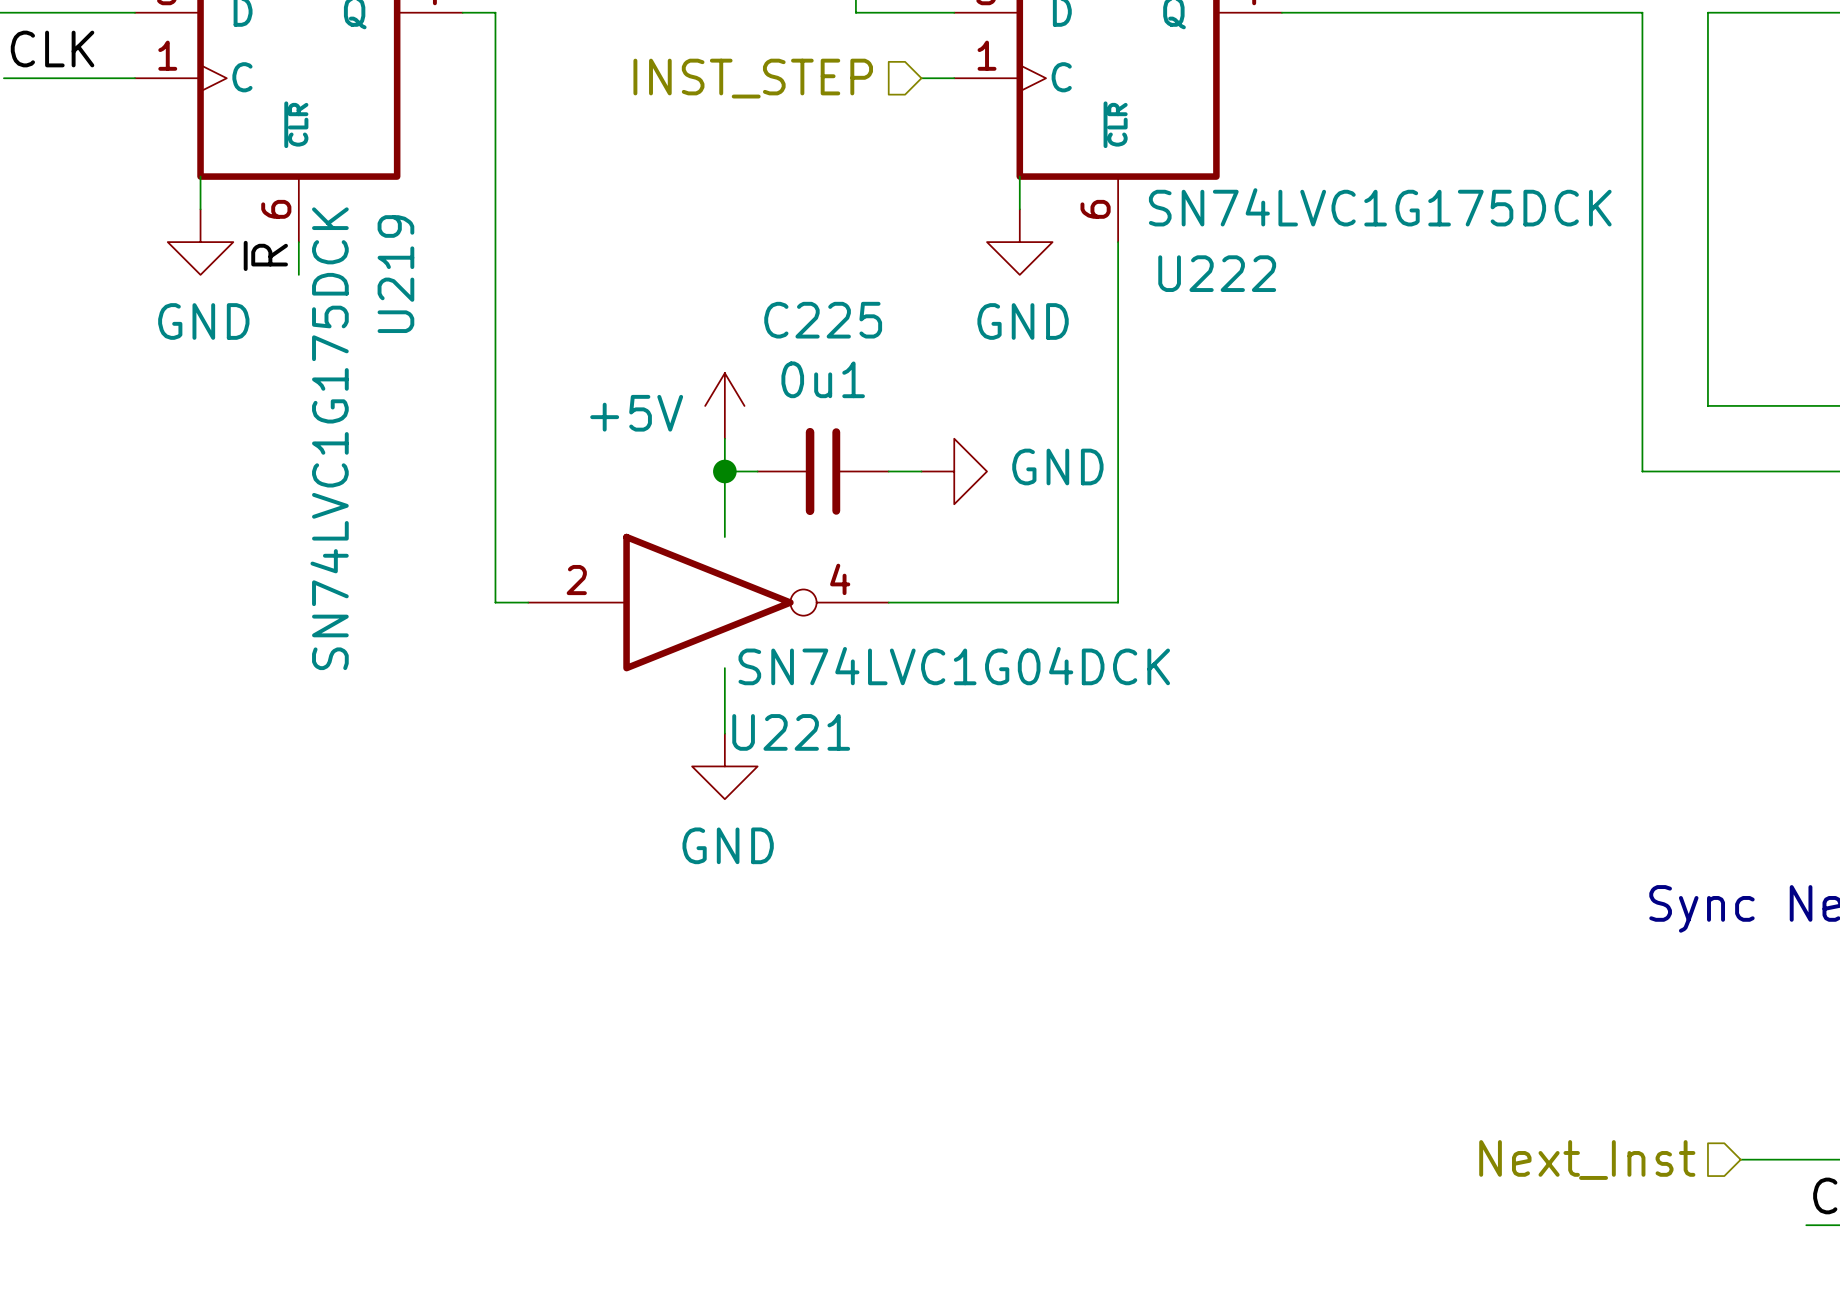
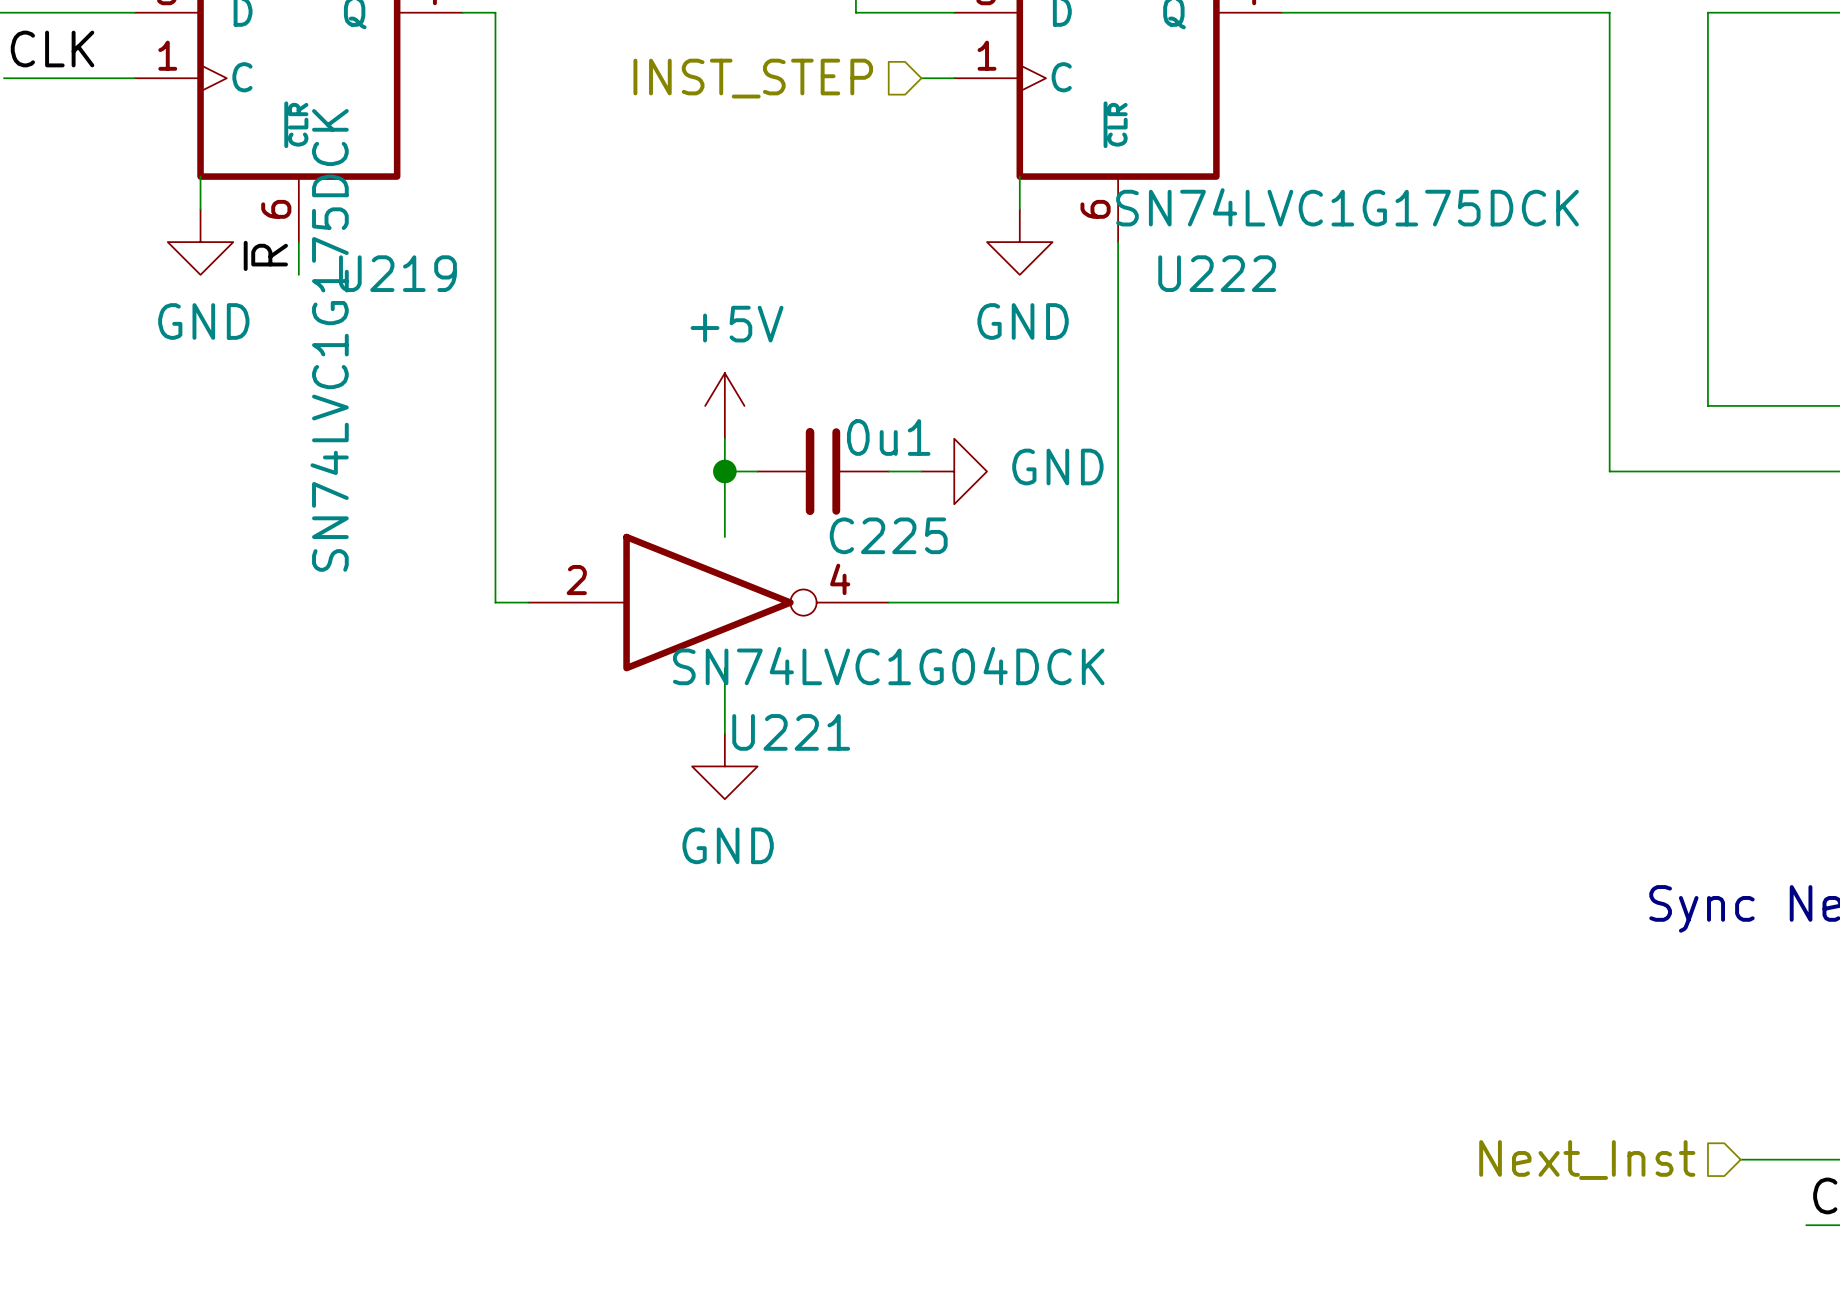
wire: (1609, 12) (1642, 12) (1642, 471) -> (1609, 12) (1609, 471) (1642, 471)
U222 value position: SN74LVC1G175DCK (1380, 207) -> SN74LVC1G175DCK (1347, 207)
U219 name rotation: 0° (395, 274) -> 90° clockwise (397, 273)
C225 name position: C225 (823, 320) -> C225 (888, 535)
C225 value position: 0u1 (823, 379) -> 0u1 (888, 437)
power symbol text position: +5V (636, 413) -> +5V (737, 324)
U219 value position: SN74LVC1G175DCK (329, 438) -> SN74LVC1G175DCK (329, 340)
U221 value position: SN74LVC1G04DCK (954, 666) -> SN74LVC1G04DCK (888, 666)

